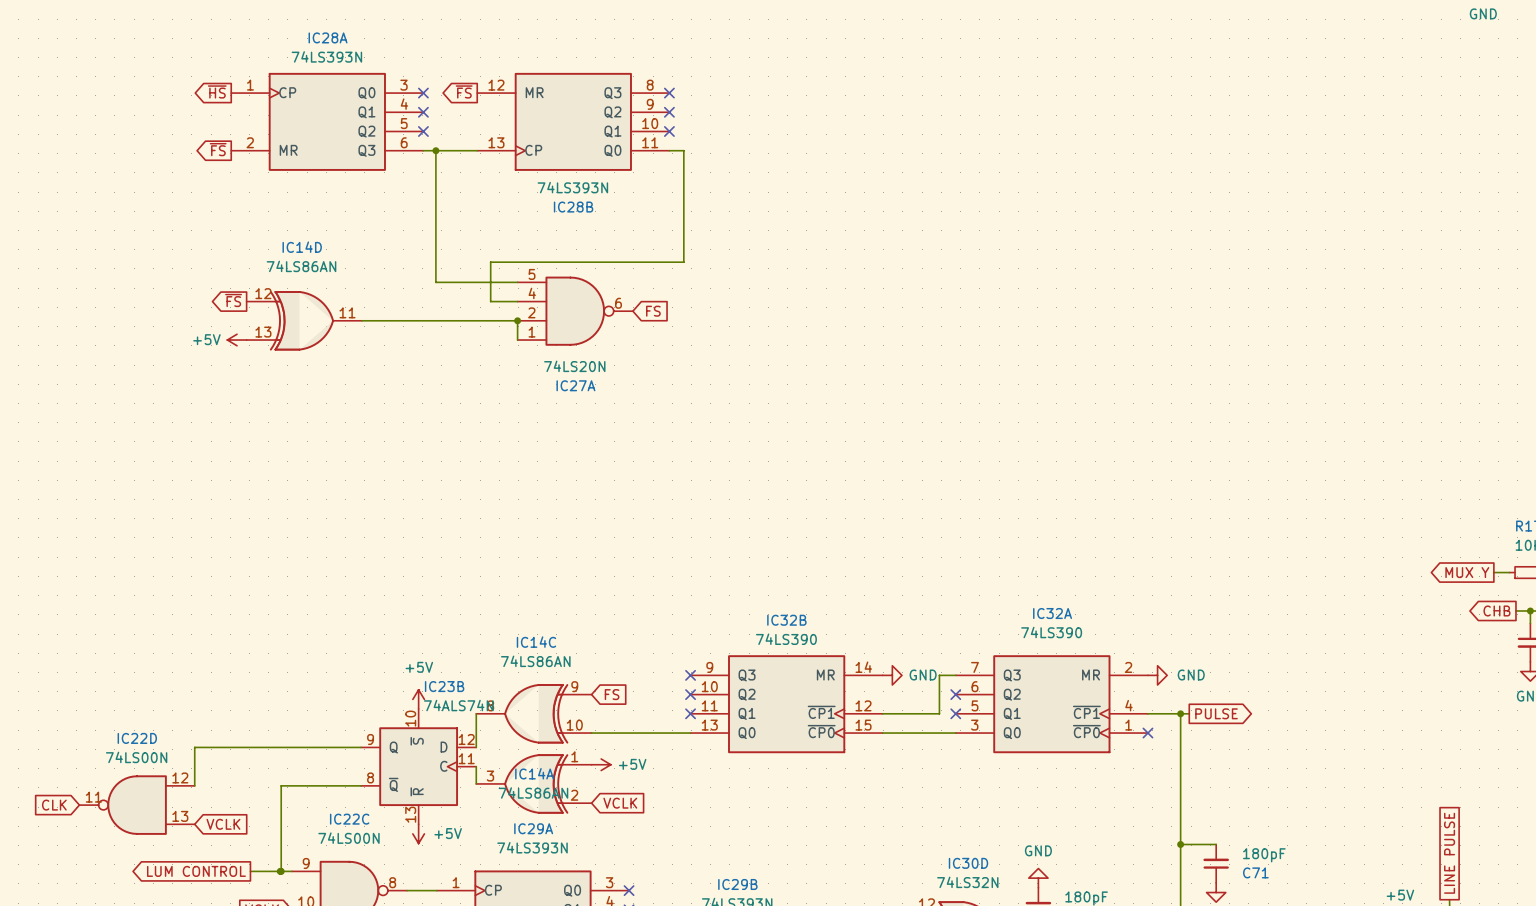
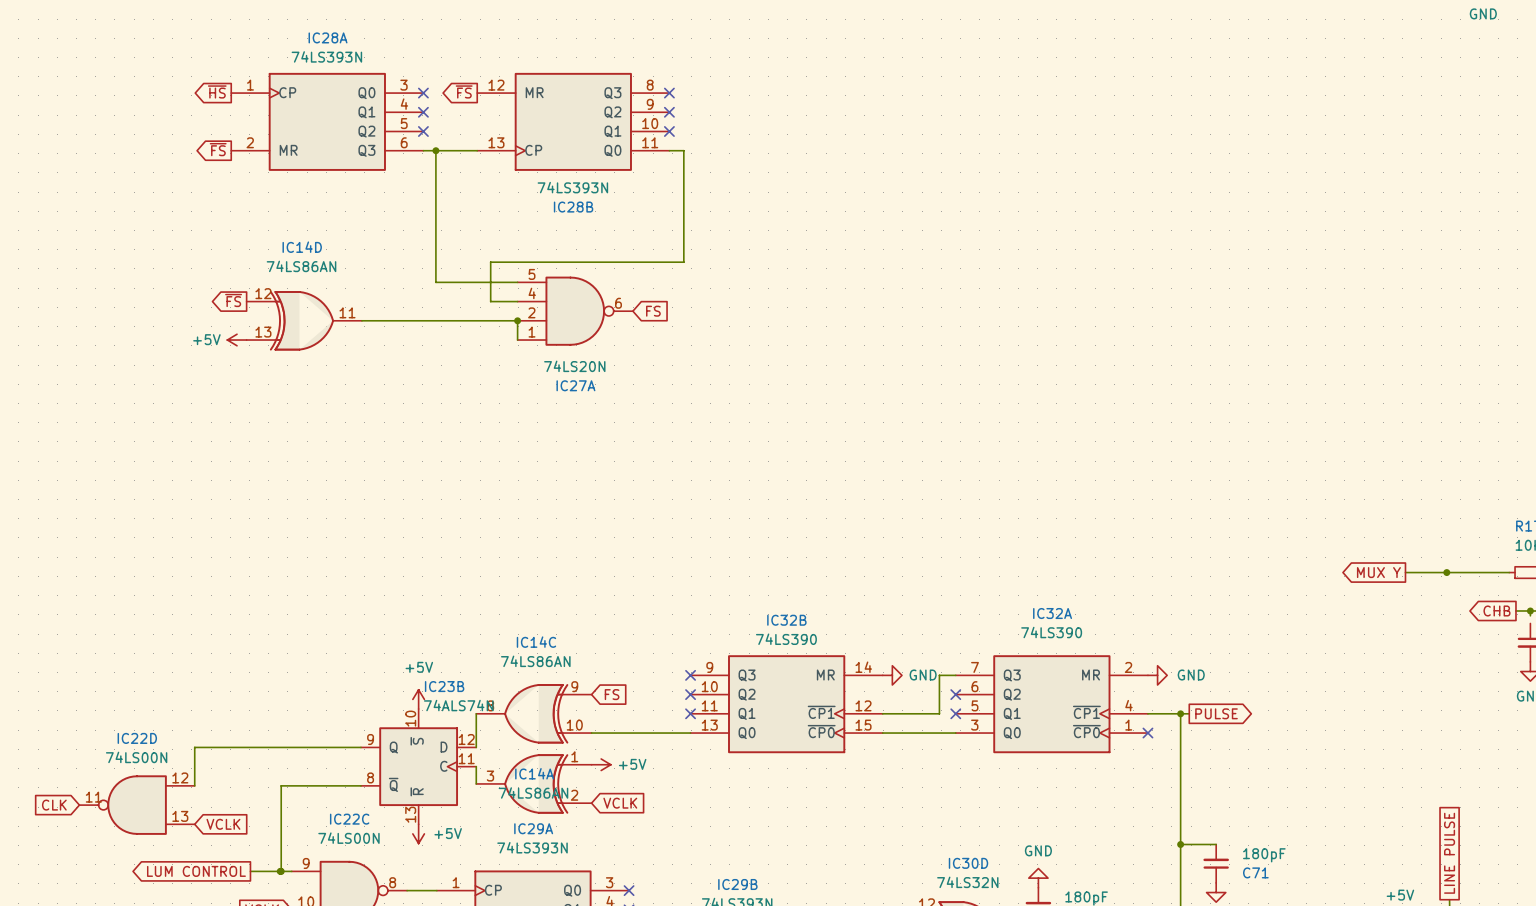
wire: none -> (1405, 572) (1493, 572)
junction: none -> (1446, 572)
global label position: MUX Y (1467, 572) -> MUX Y (1378, 572)
wire: (1530, 615) (1530, 623) -> none

